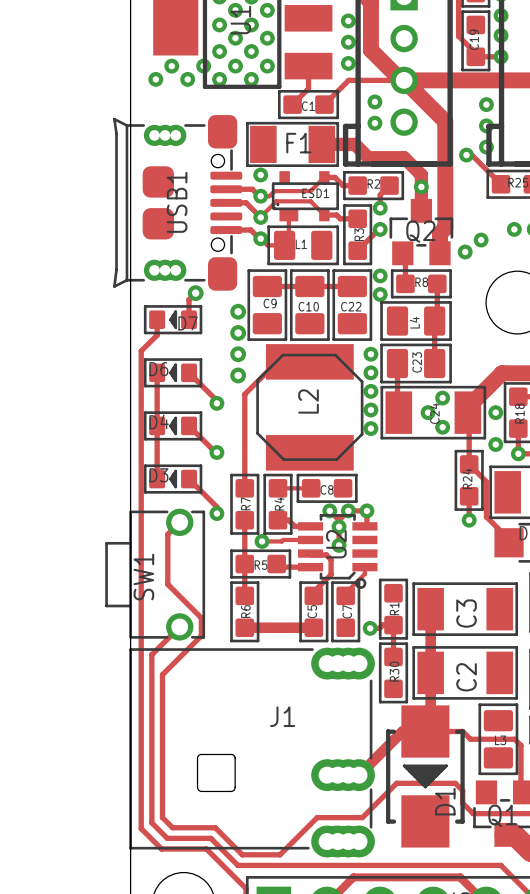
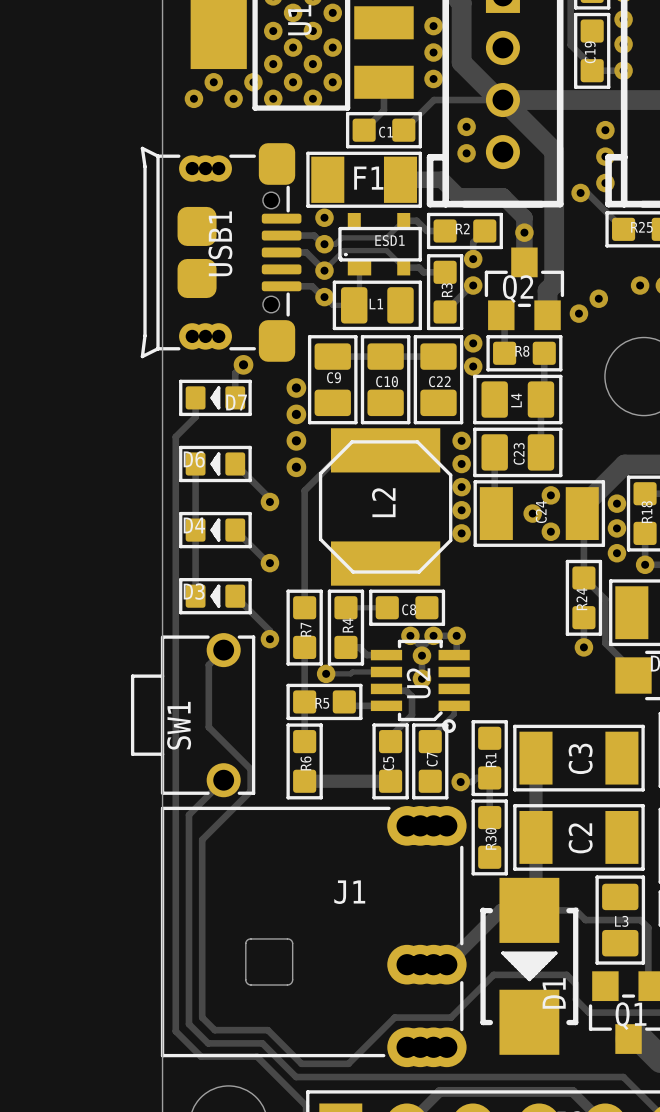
via: none -> (616, 503)
via: (495, 412) -> none
via: none -> (616, 528)

